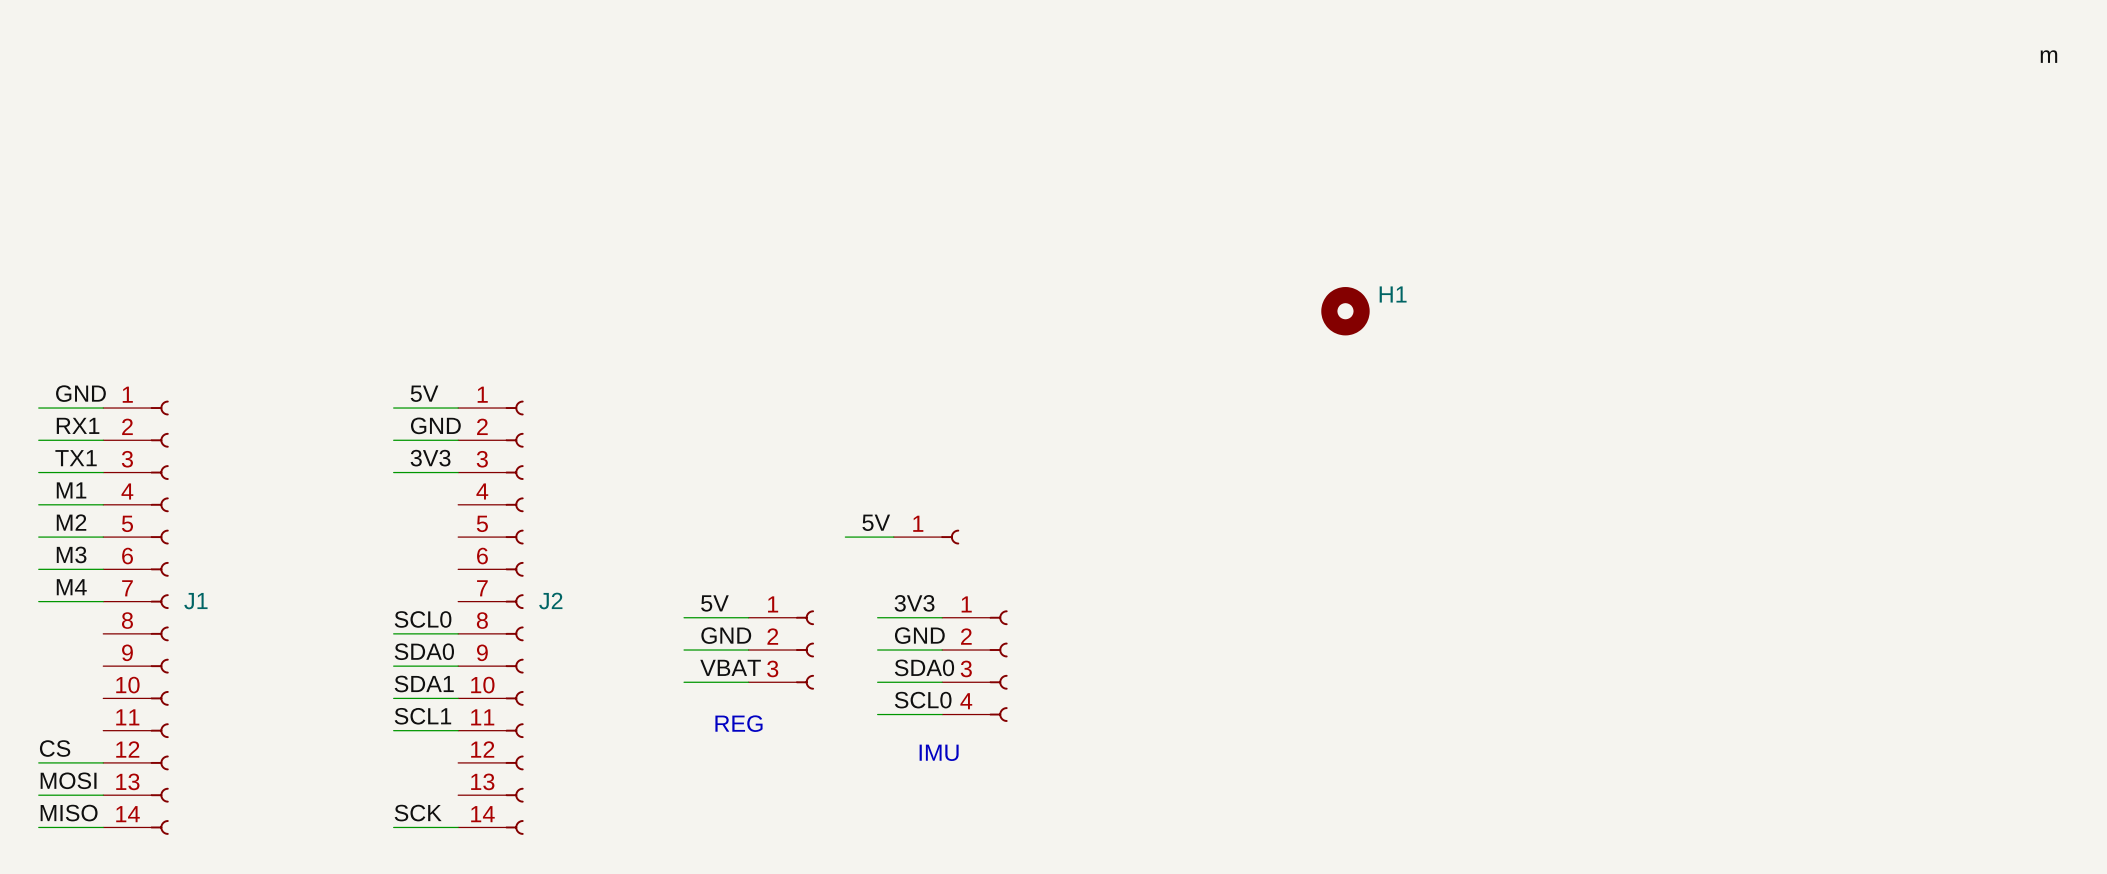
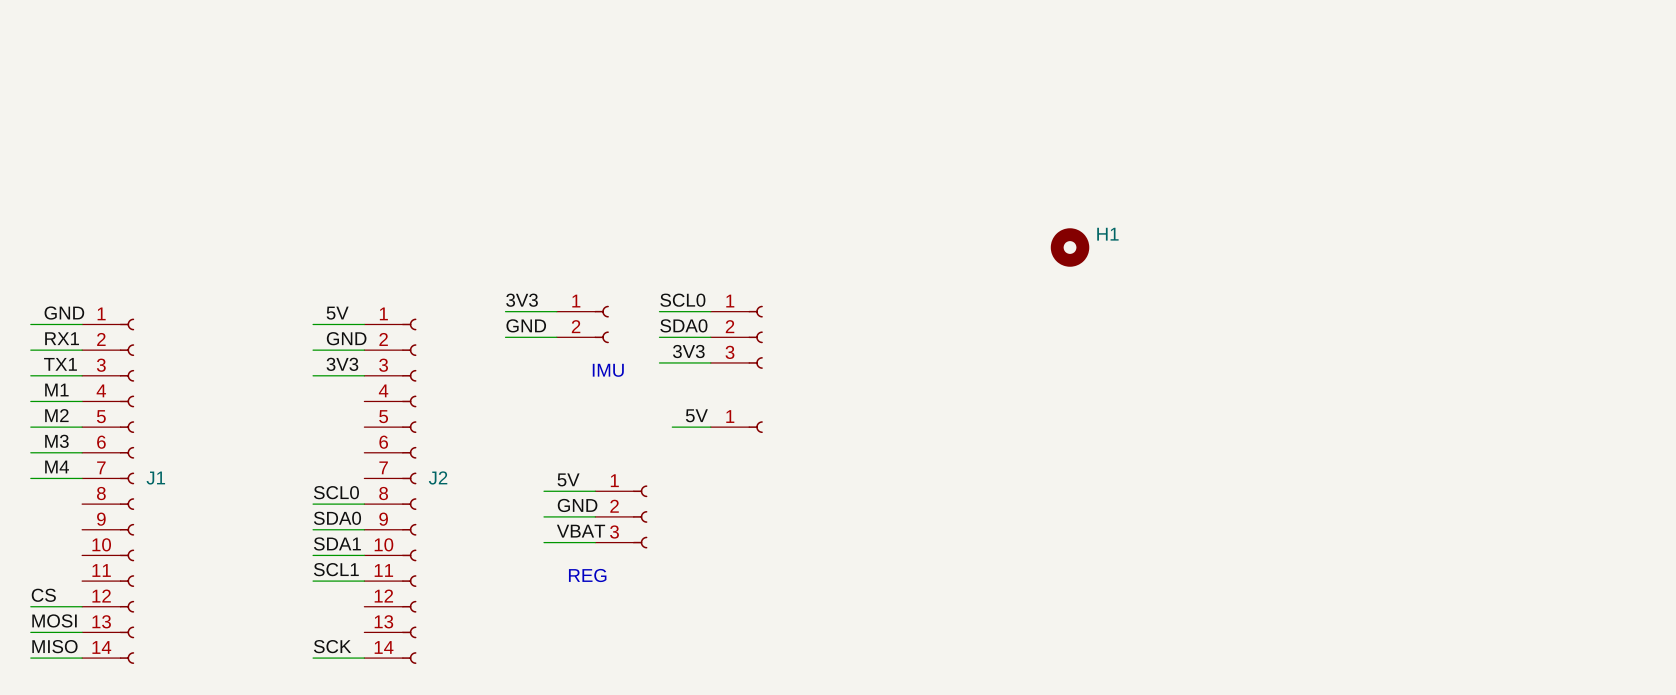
label: m (2048, 56) -> none
label: none -> 3V3 (522, 300)
label: none -> SCL0 (682, 300)
wire: none -> (505, 311) (556, 311)
part: none -> (582, 324)
label: none -> GND (526, 325)
wire: none -> (505, 337) (556, 337)
part: none -> (736, 337)
text: none -> IMU (608, 370)
label position: 3V3 (914, 603) -> 3V3 (688, 351)
wire: (877, 617) (942, 617) -> (659, 311) (710, 311)
label: GND (919, 635) -> none
wire: (877, 650) (942, 650) -> (659, 337) (710, 337)
part: (974, 666) -> none
label position: SDA0 (924, 667) -> SDA0 (683, 325)
wire: (877, 682) (942, 682) -> (659, 362) (710, 362)
label: SCL0 (923, 700) -> none
wire: (877, 714) (942, 714) -> none
text: IMU (939, 752) -> none

